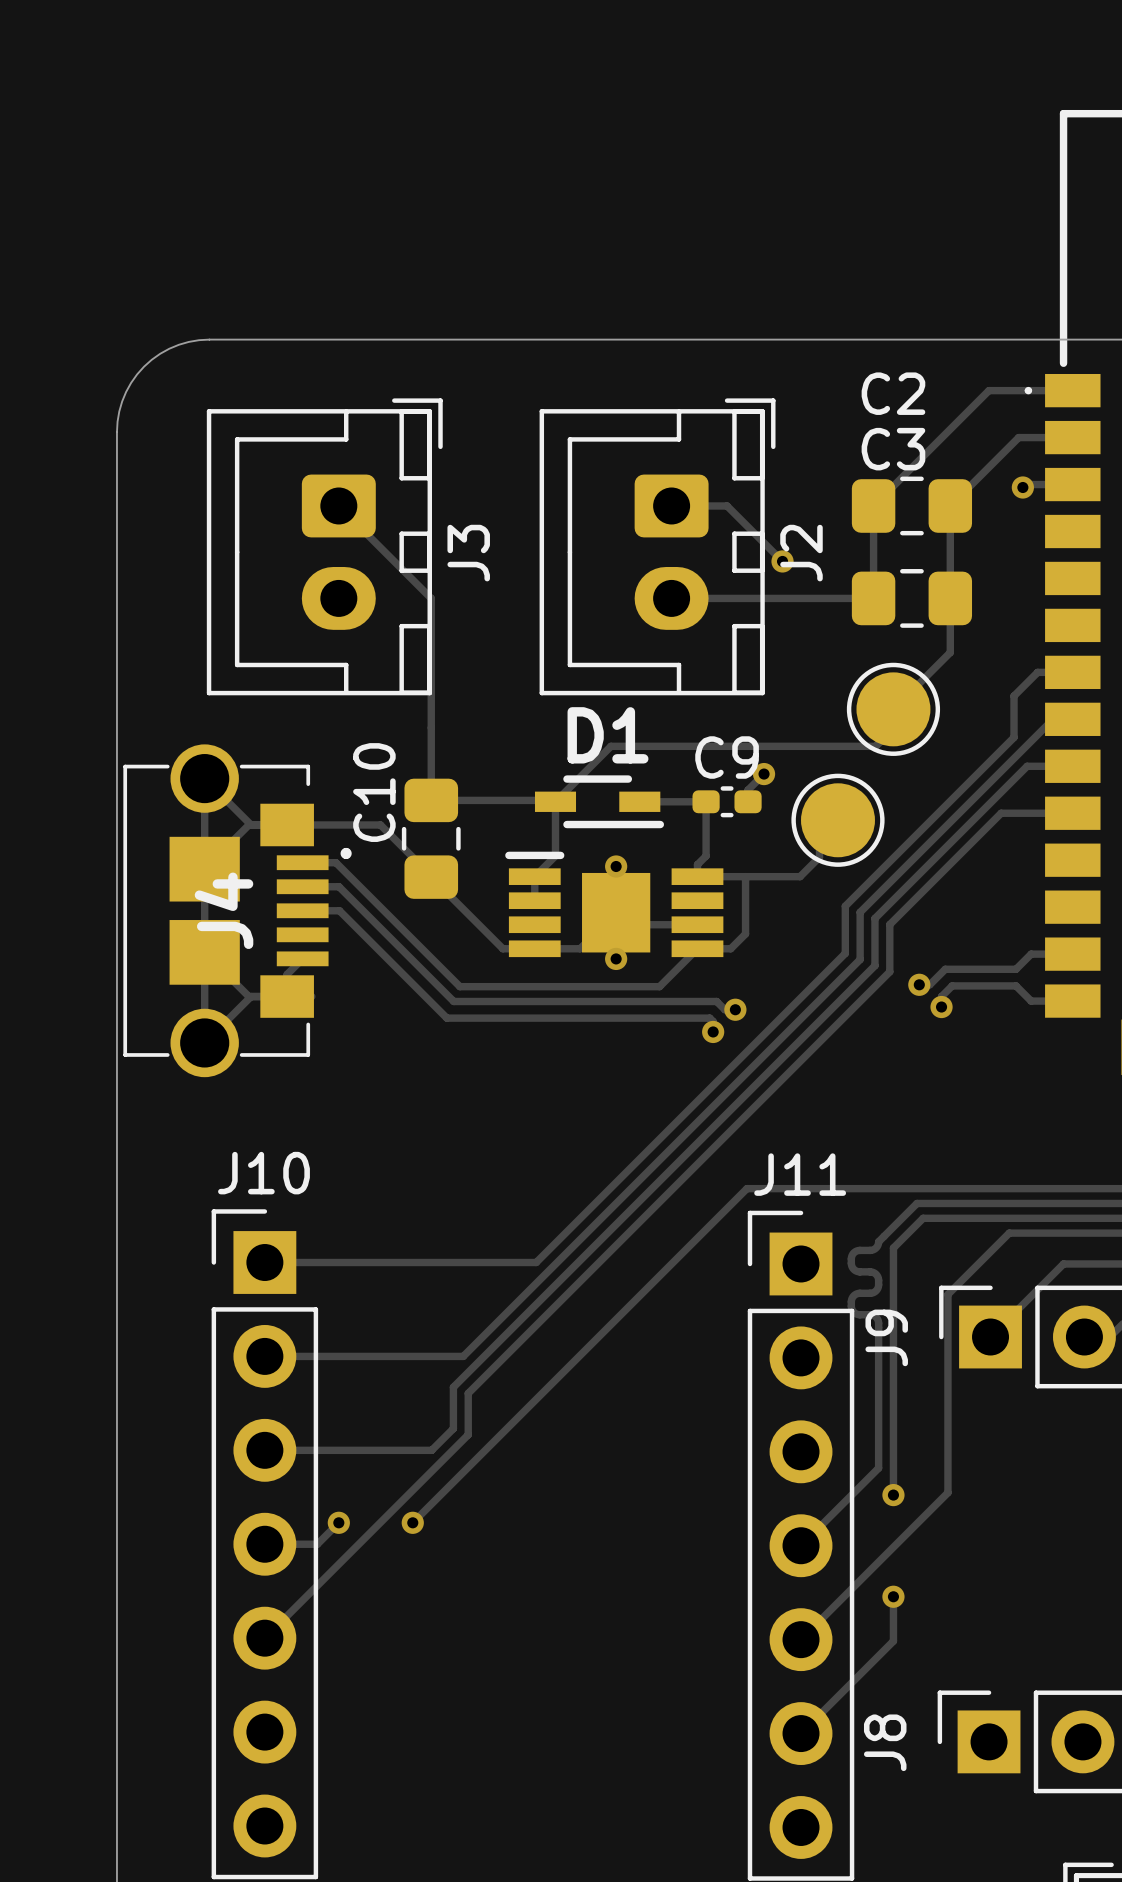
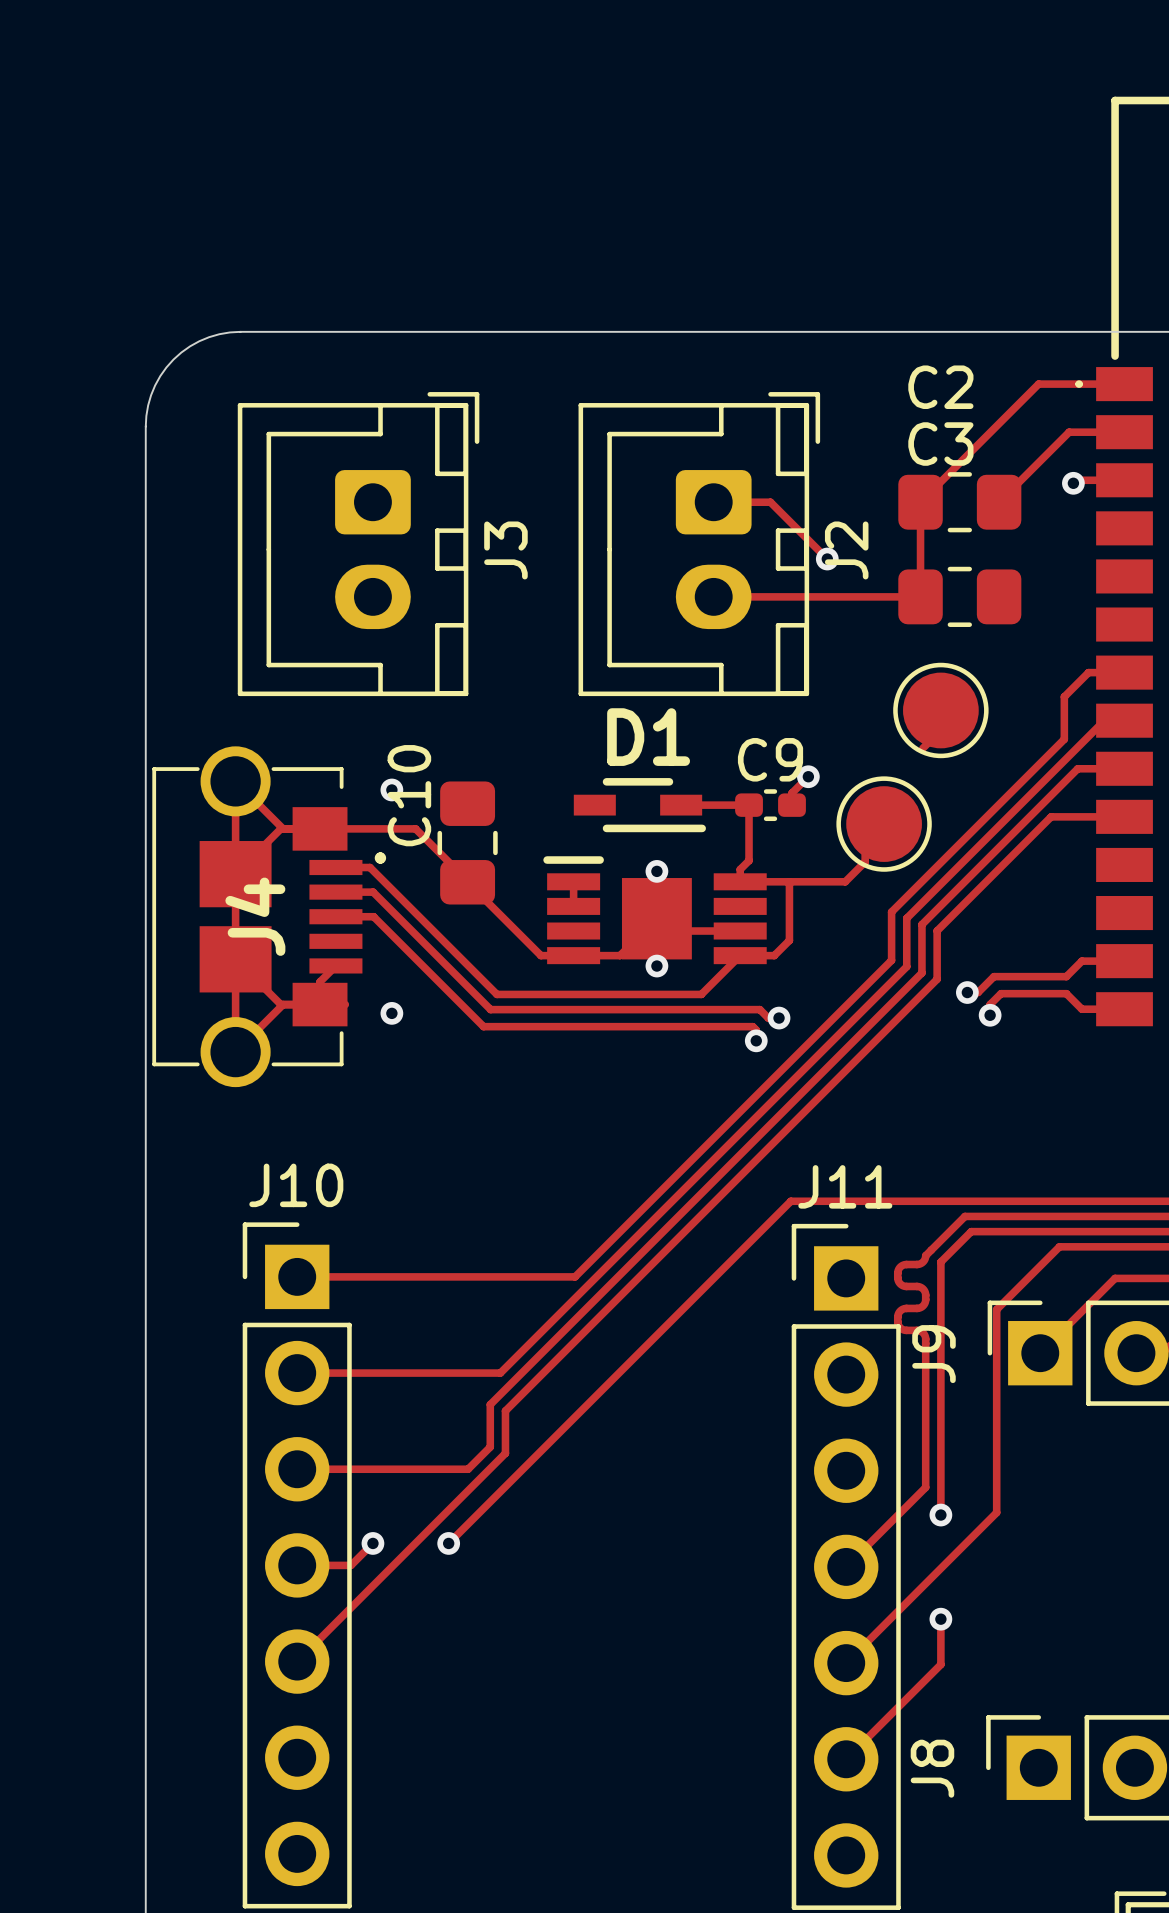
track: (338, 505) (431, 598) (431, 800) (554, 800) -> none
track: (950, 505) (950, 652) (893, 709) -> none
track: (875, 746) (610, 746) (555, 801) (555, 855) (534, 876) -> none
via: none -> (391, 789)
via: none -> (391, 1013)

